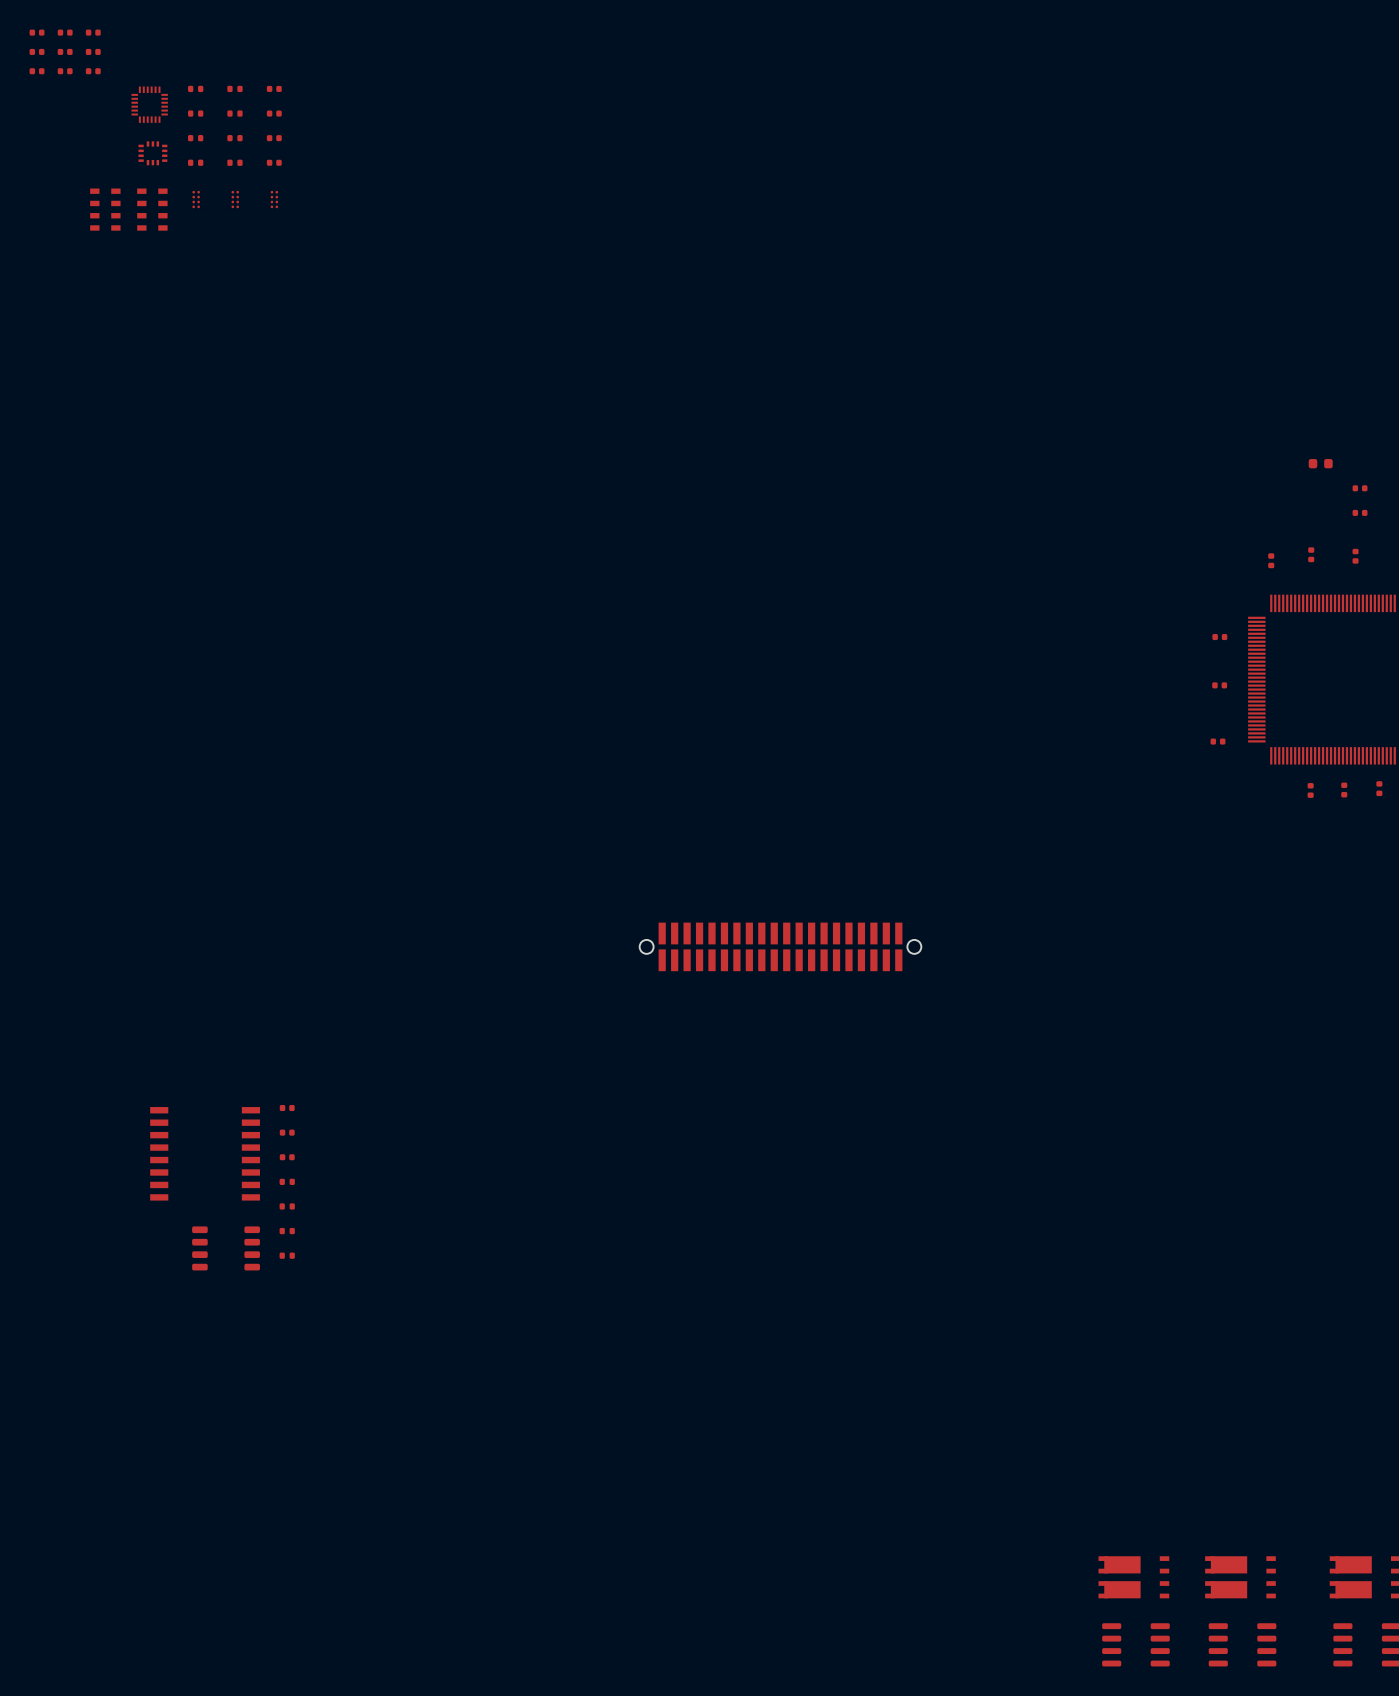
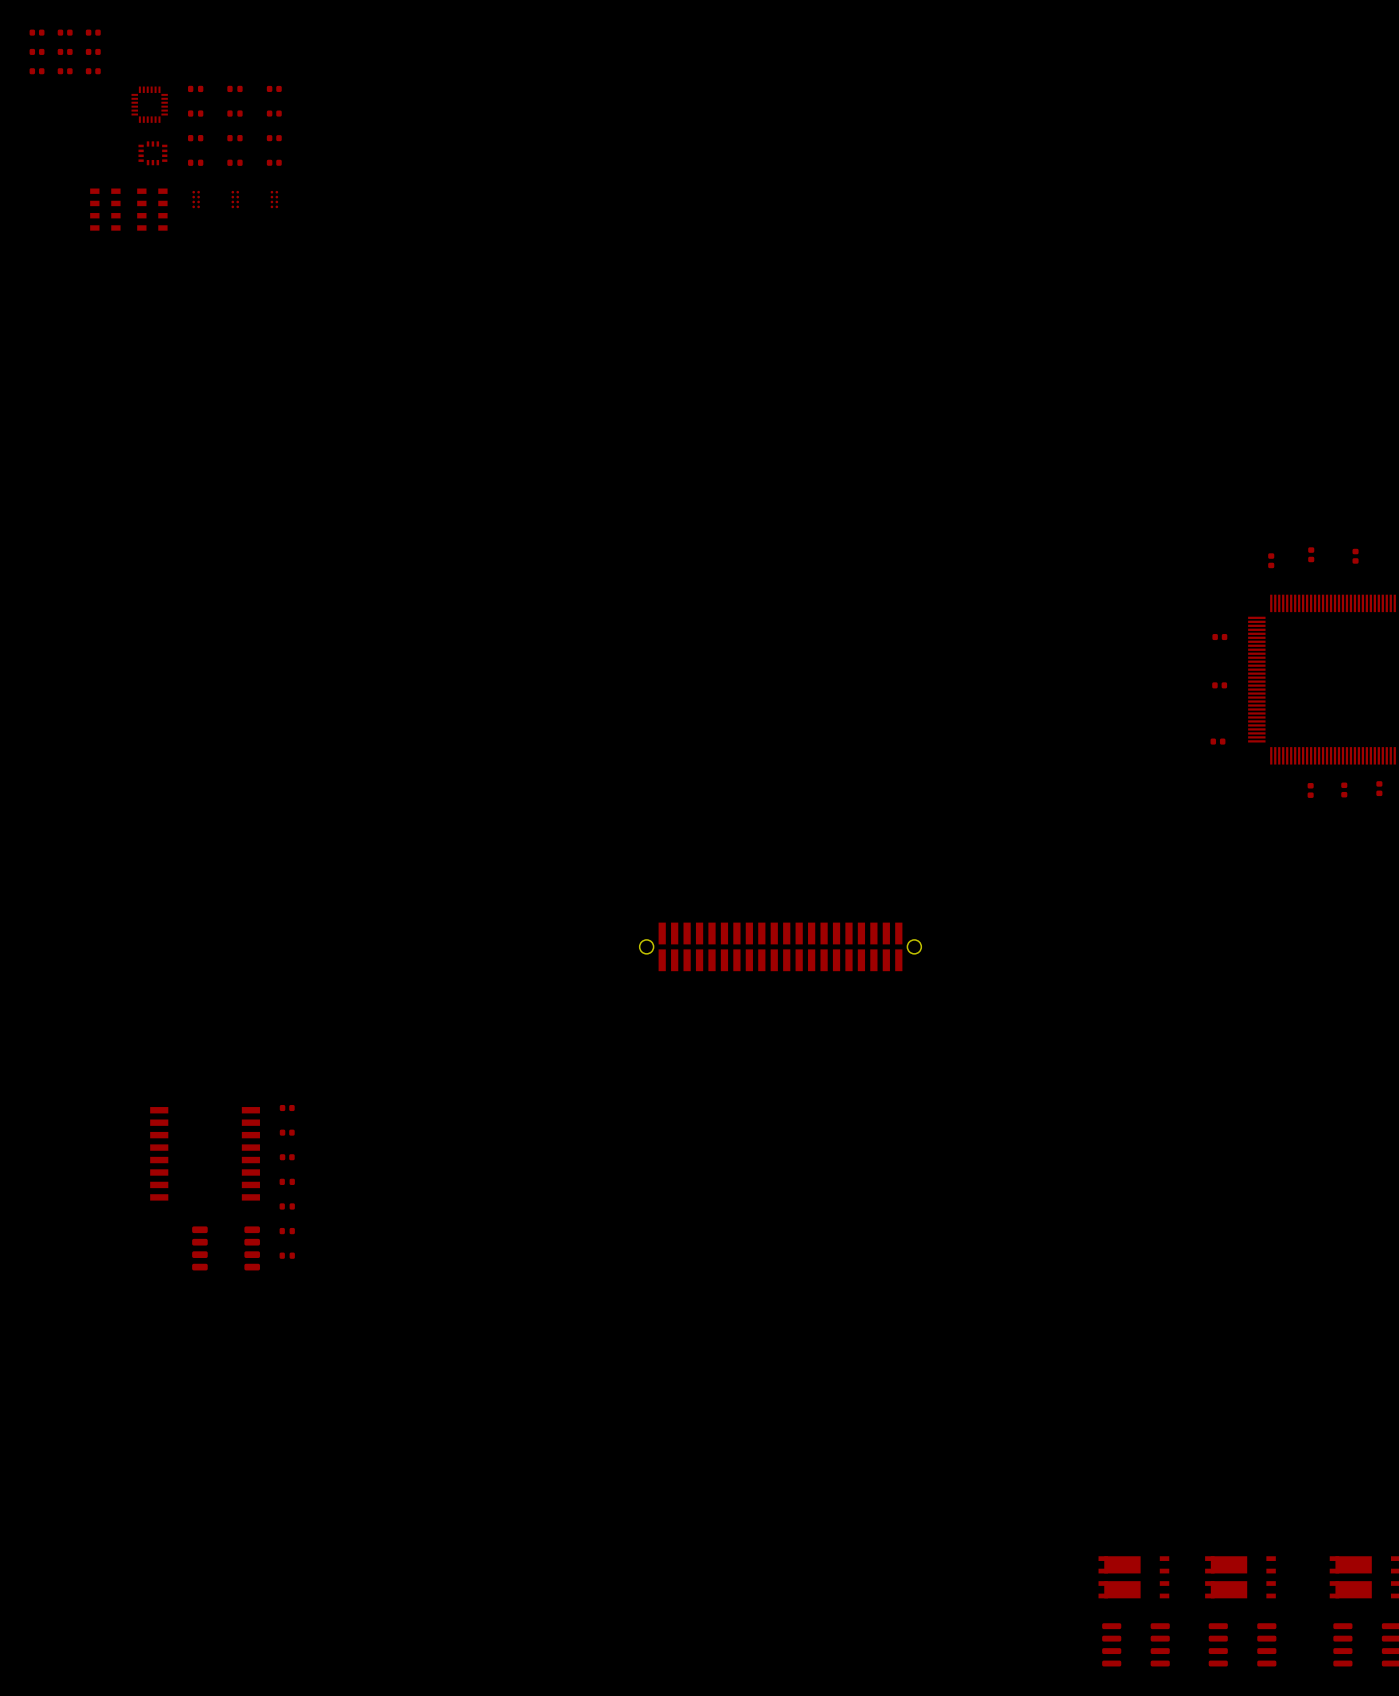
part: (1320, 463) -> none
part: (1360, 488) -> none
part: (1360, 512) -> none

